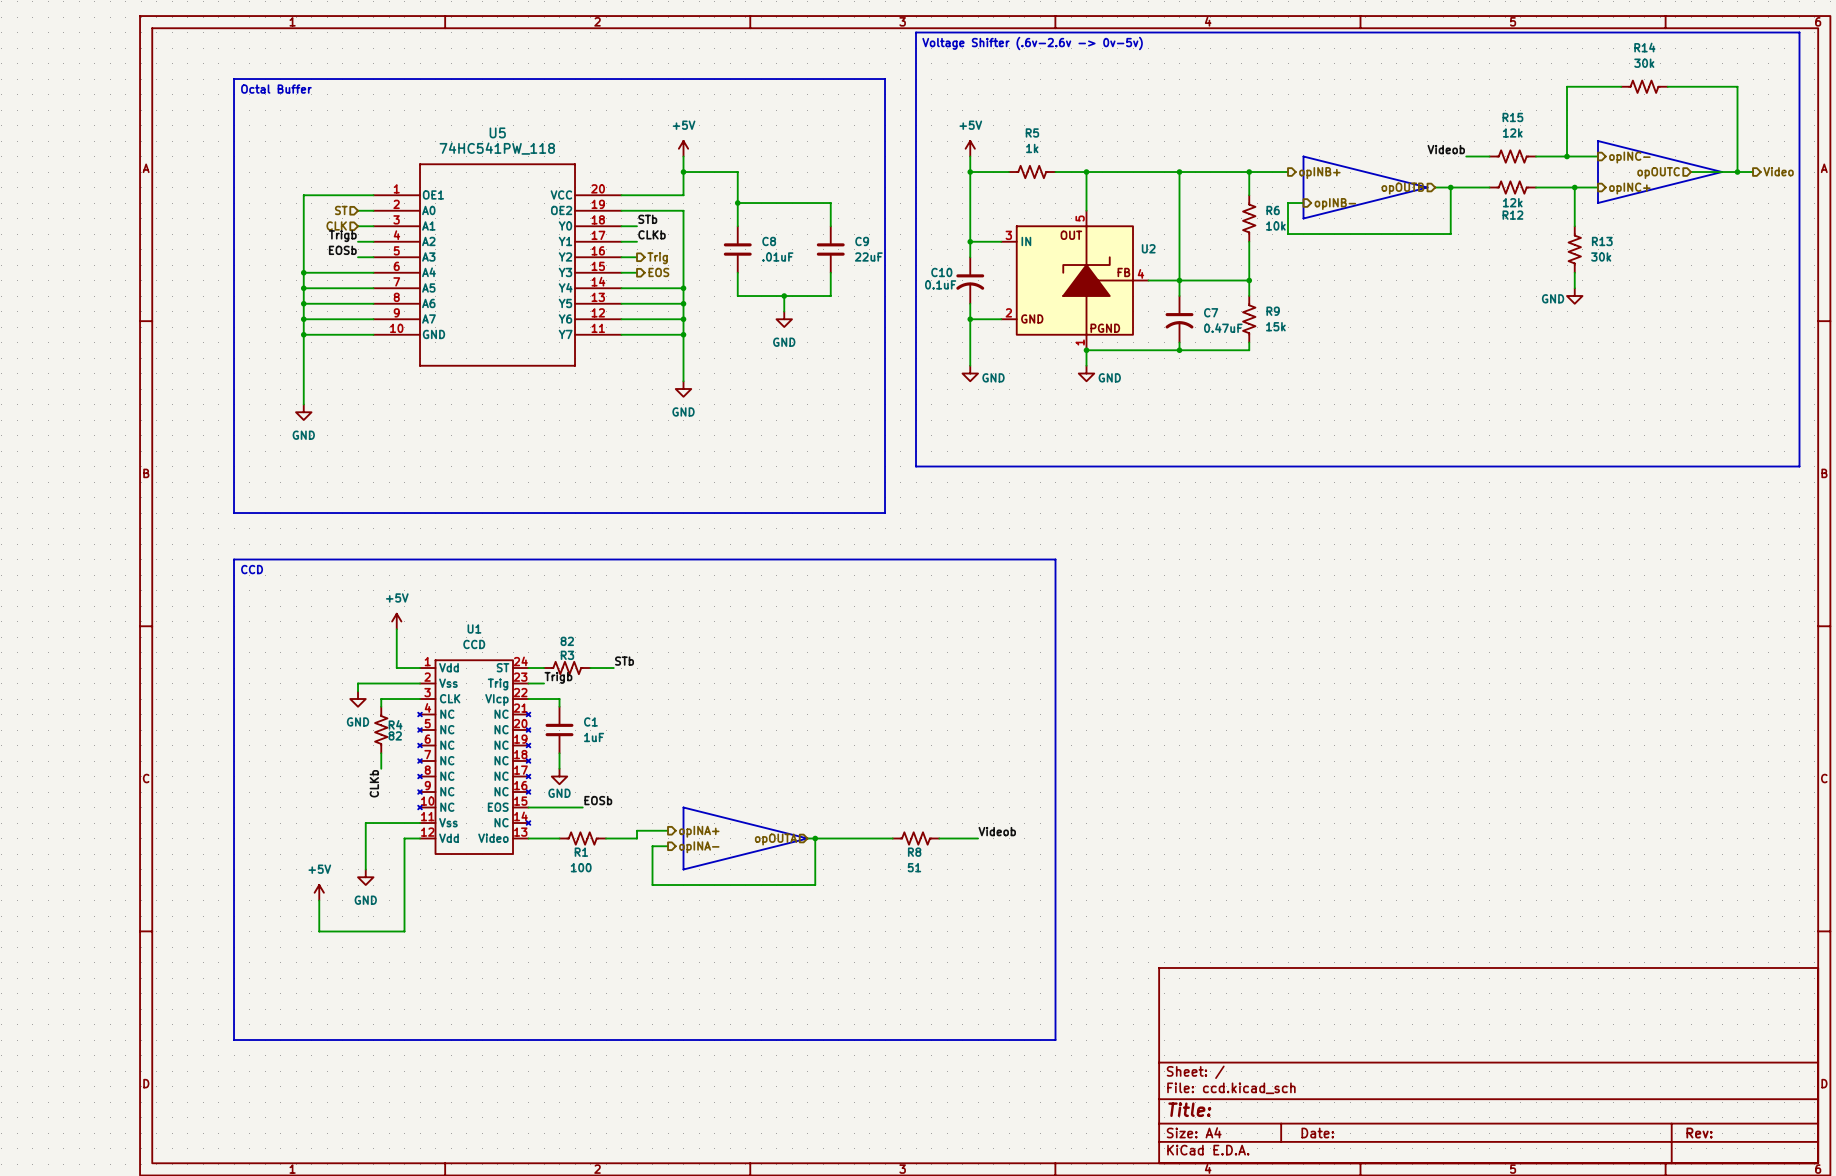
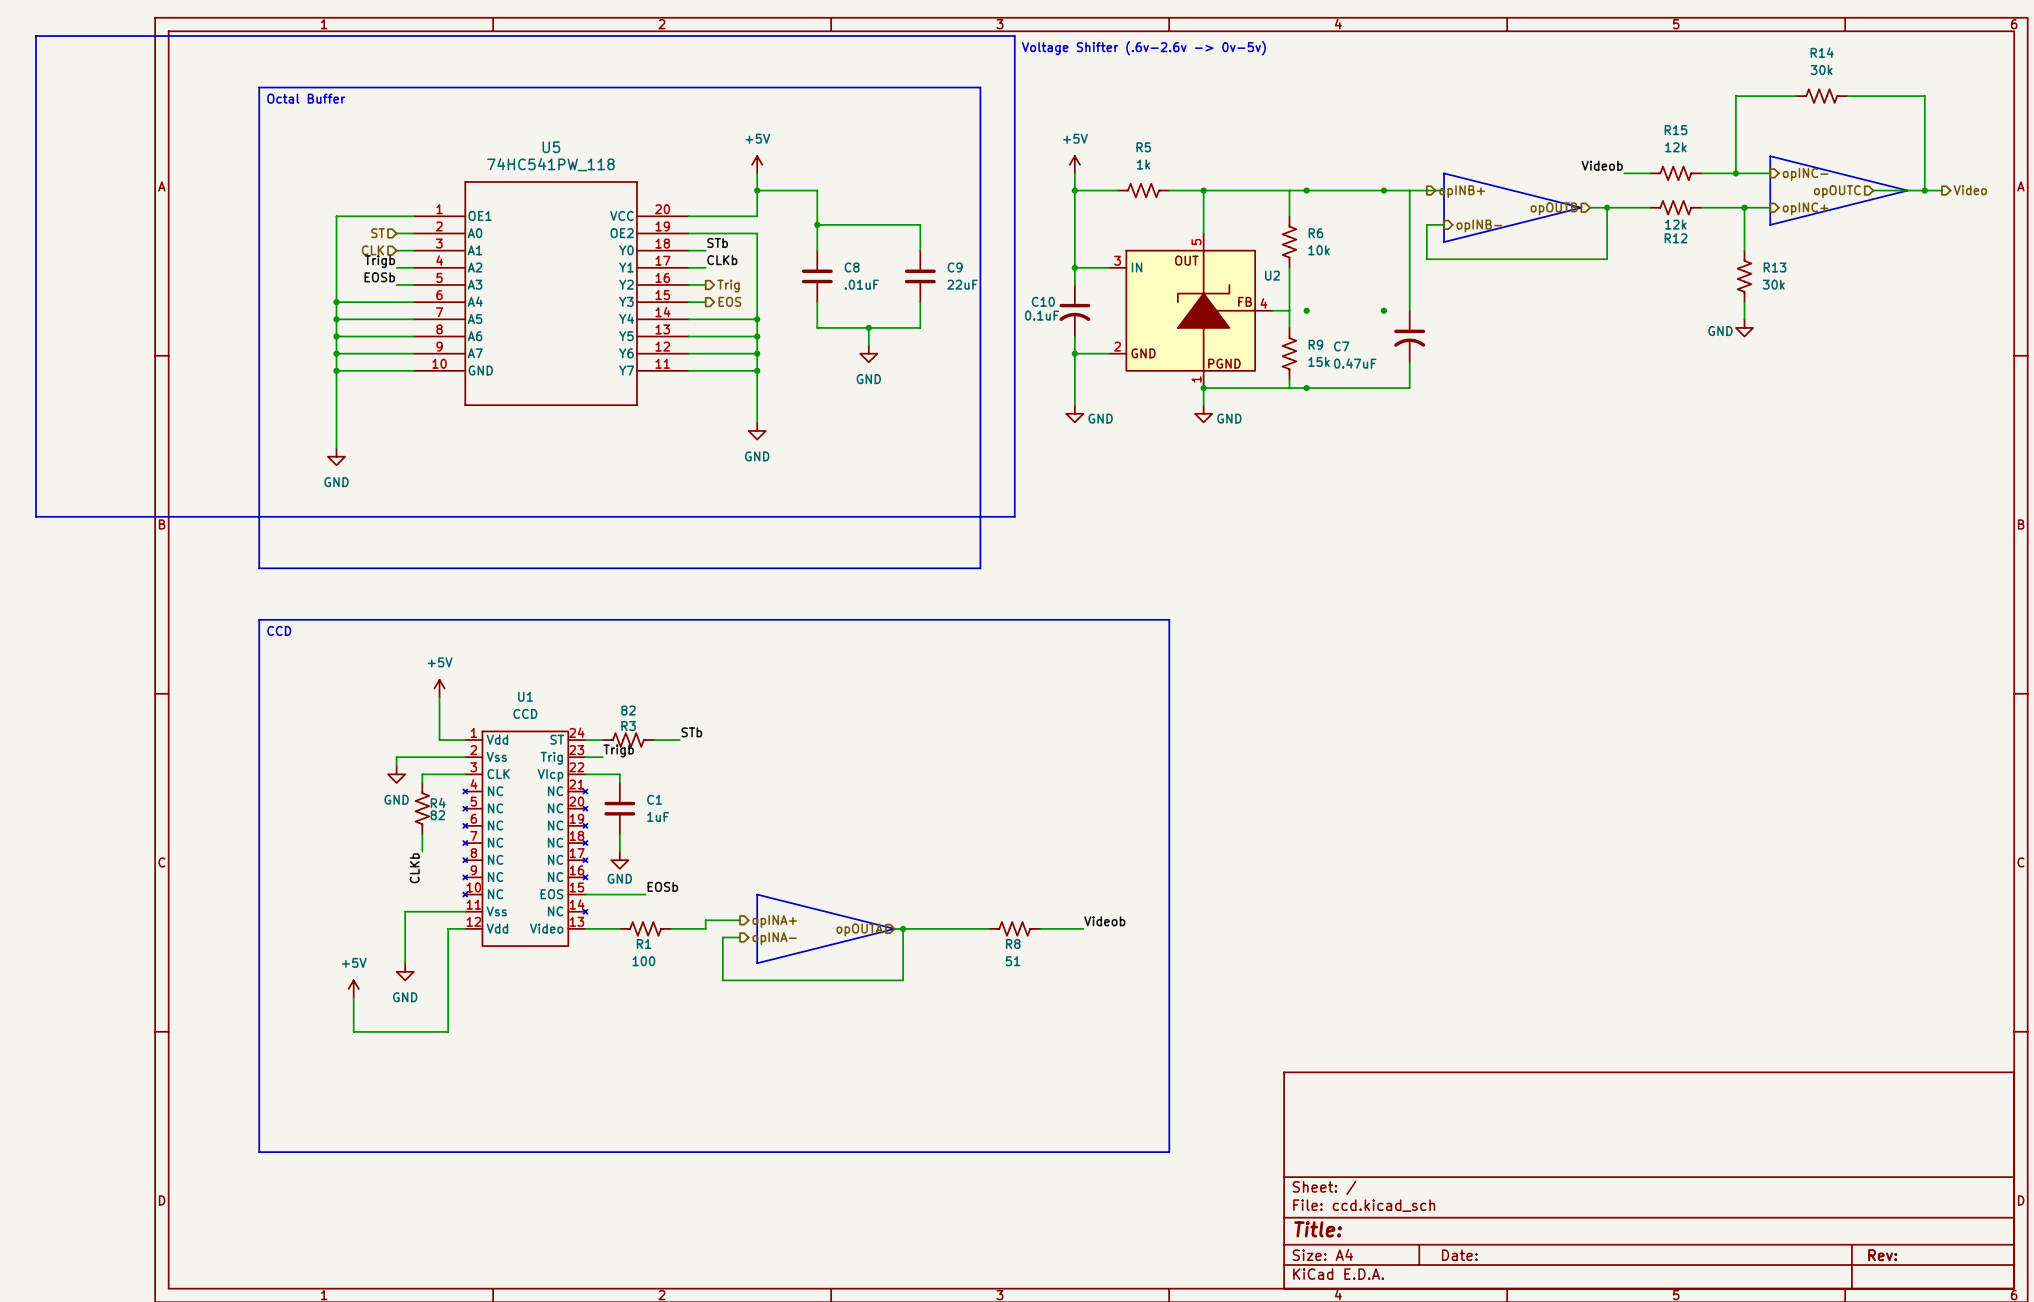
line: (916, 32) (1799, 32) (1799, 466) (916, 466) -> (1014, 36) (36, 36) (36, 516) (1014, 516)
wire: (1179, 172) (1179, 296) -> none
wire: (1249, 172) (1249, 195) -> (1289, 190) (1289, 216)
wire: none -> (1409, 190) (1409, 310)
wire: none -> (1426, 190) (1444, 190)
R6 position: (1249, 218) -> (1289, 242)
wire: (1249, 241) (1249, 296) -> (1289, 267) (1289, 327)
wire: (1164, 280) (1249, 280) -> none
C7 position: (1179, 319) -> (1409, 336)
R9 position: (1249, 319) -> (1289, 353)
wire: (1179, 342) (1179, 350) -> (1289, 379) (1289, 388)
wire: (1249, 342) (1249, 350) -> (1409, 362) (1409, 388) (1383, 388)

